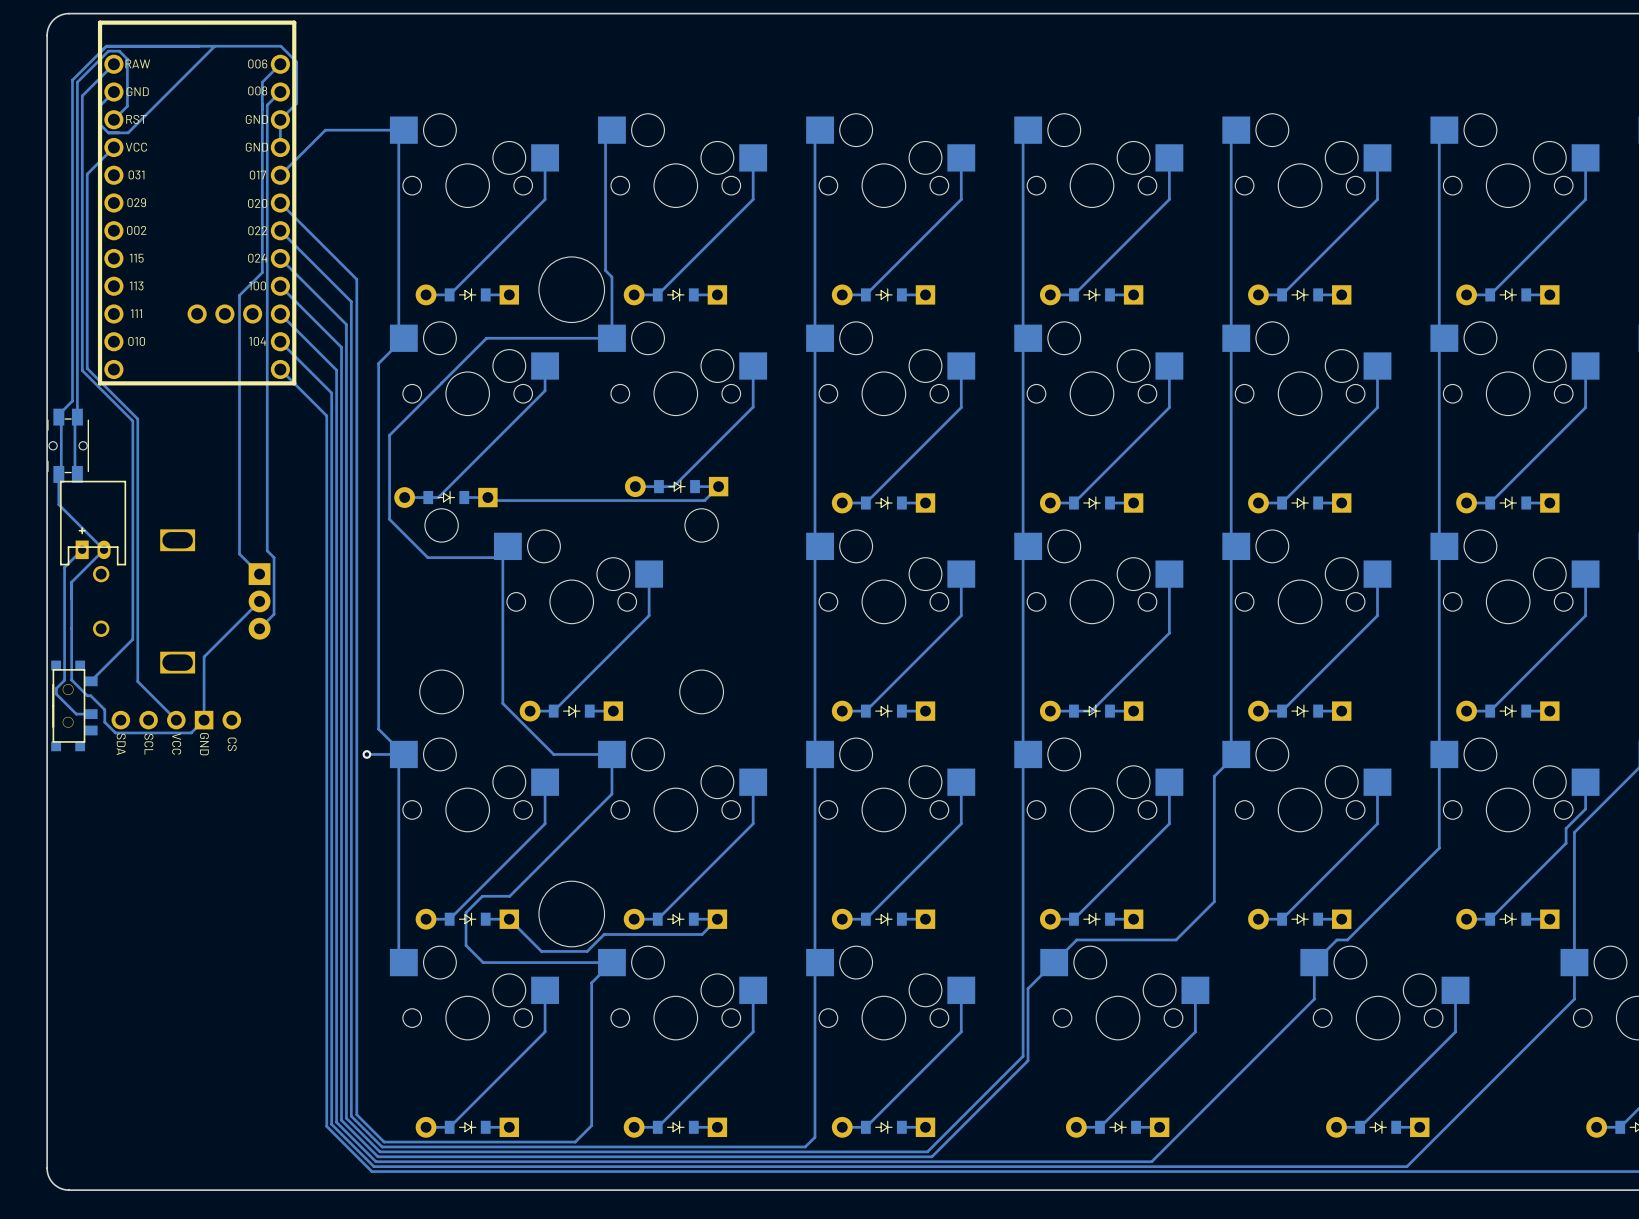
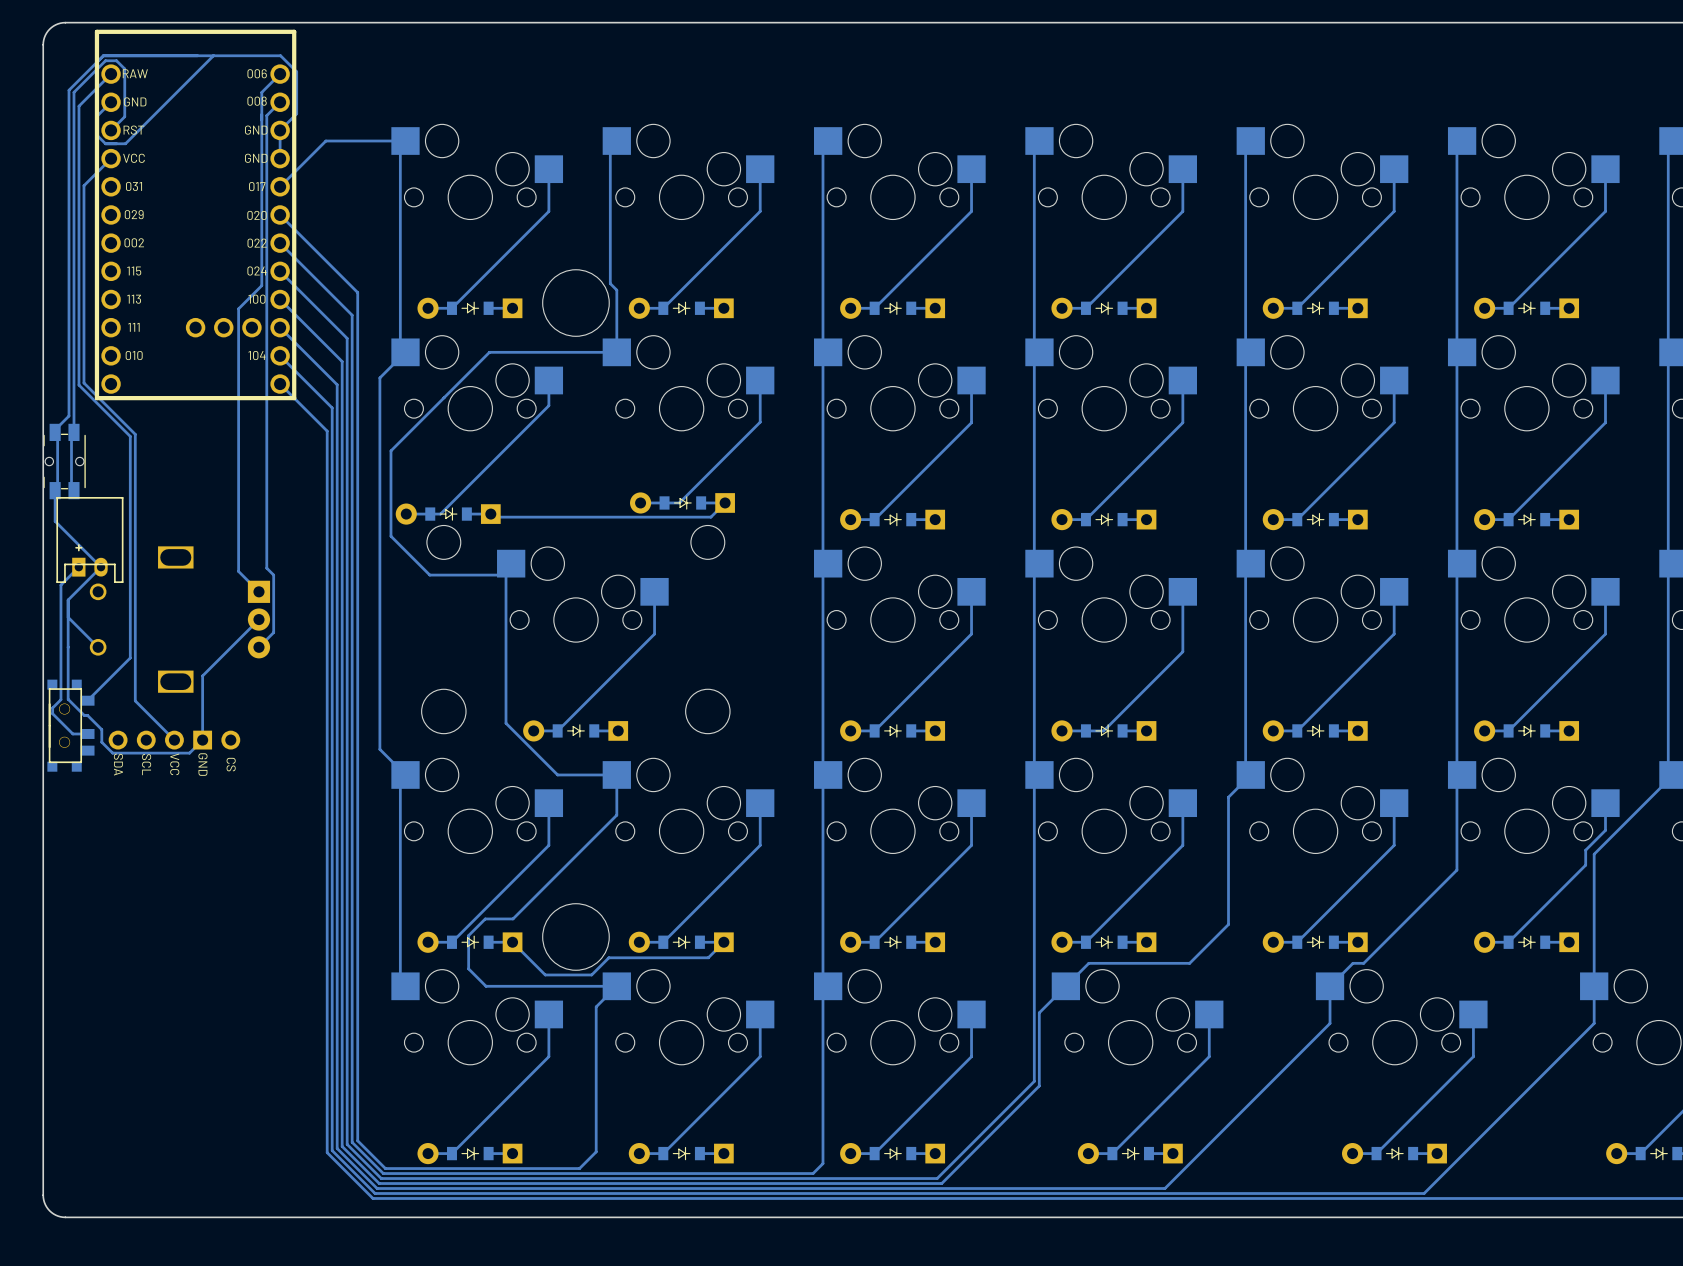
track: none -> (68, 617) (98, 647)
via: (366, 754) -> none
track: (403, 754) (366, 754) -> none

